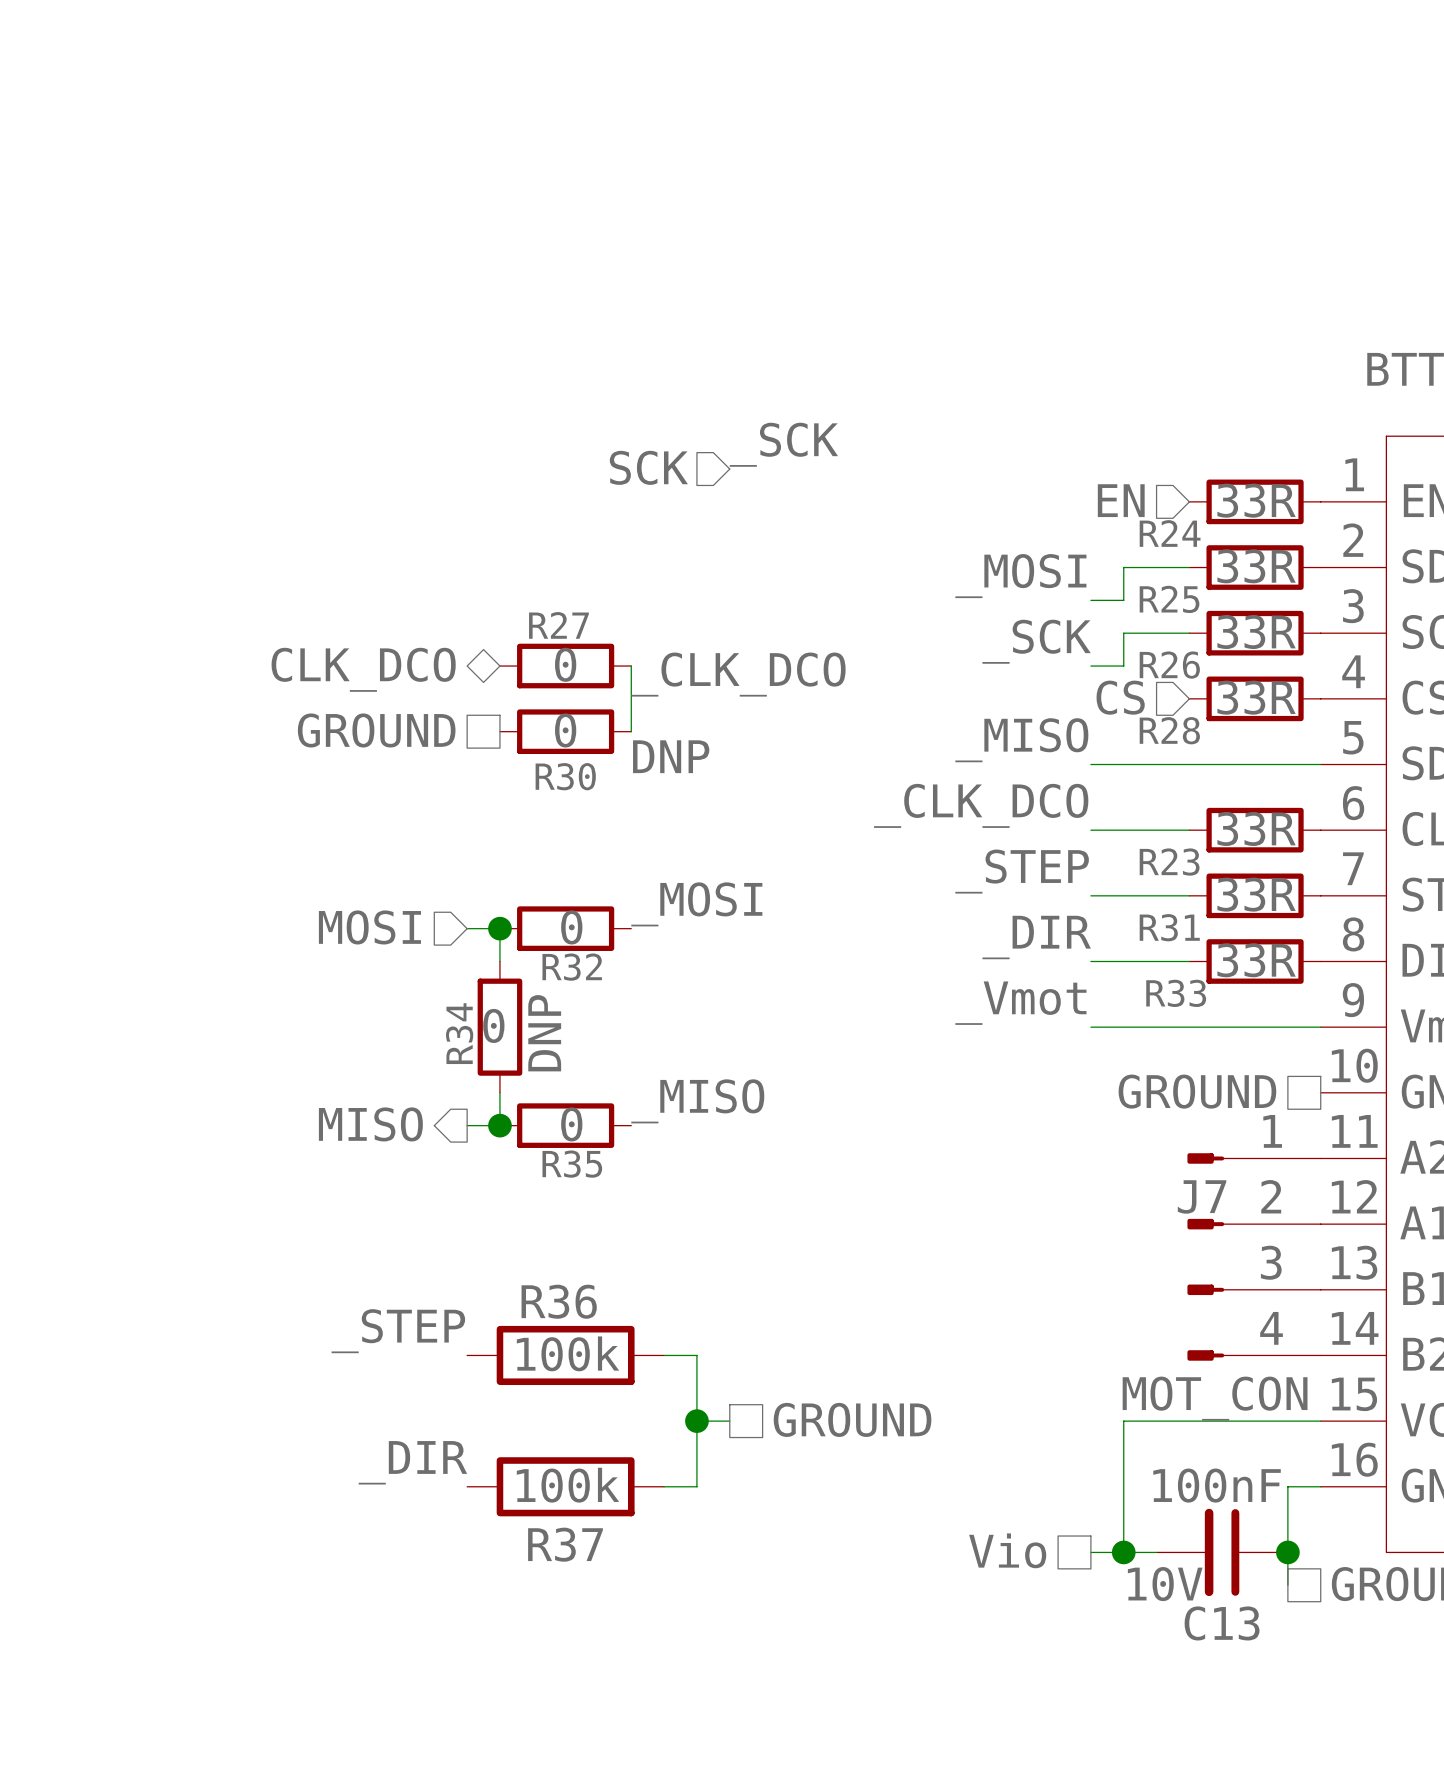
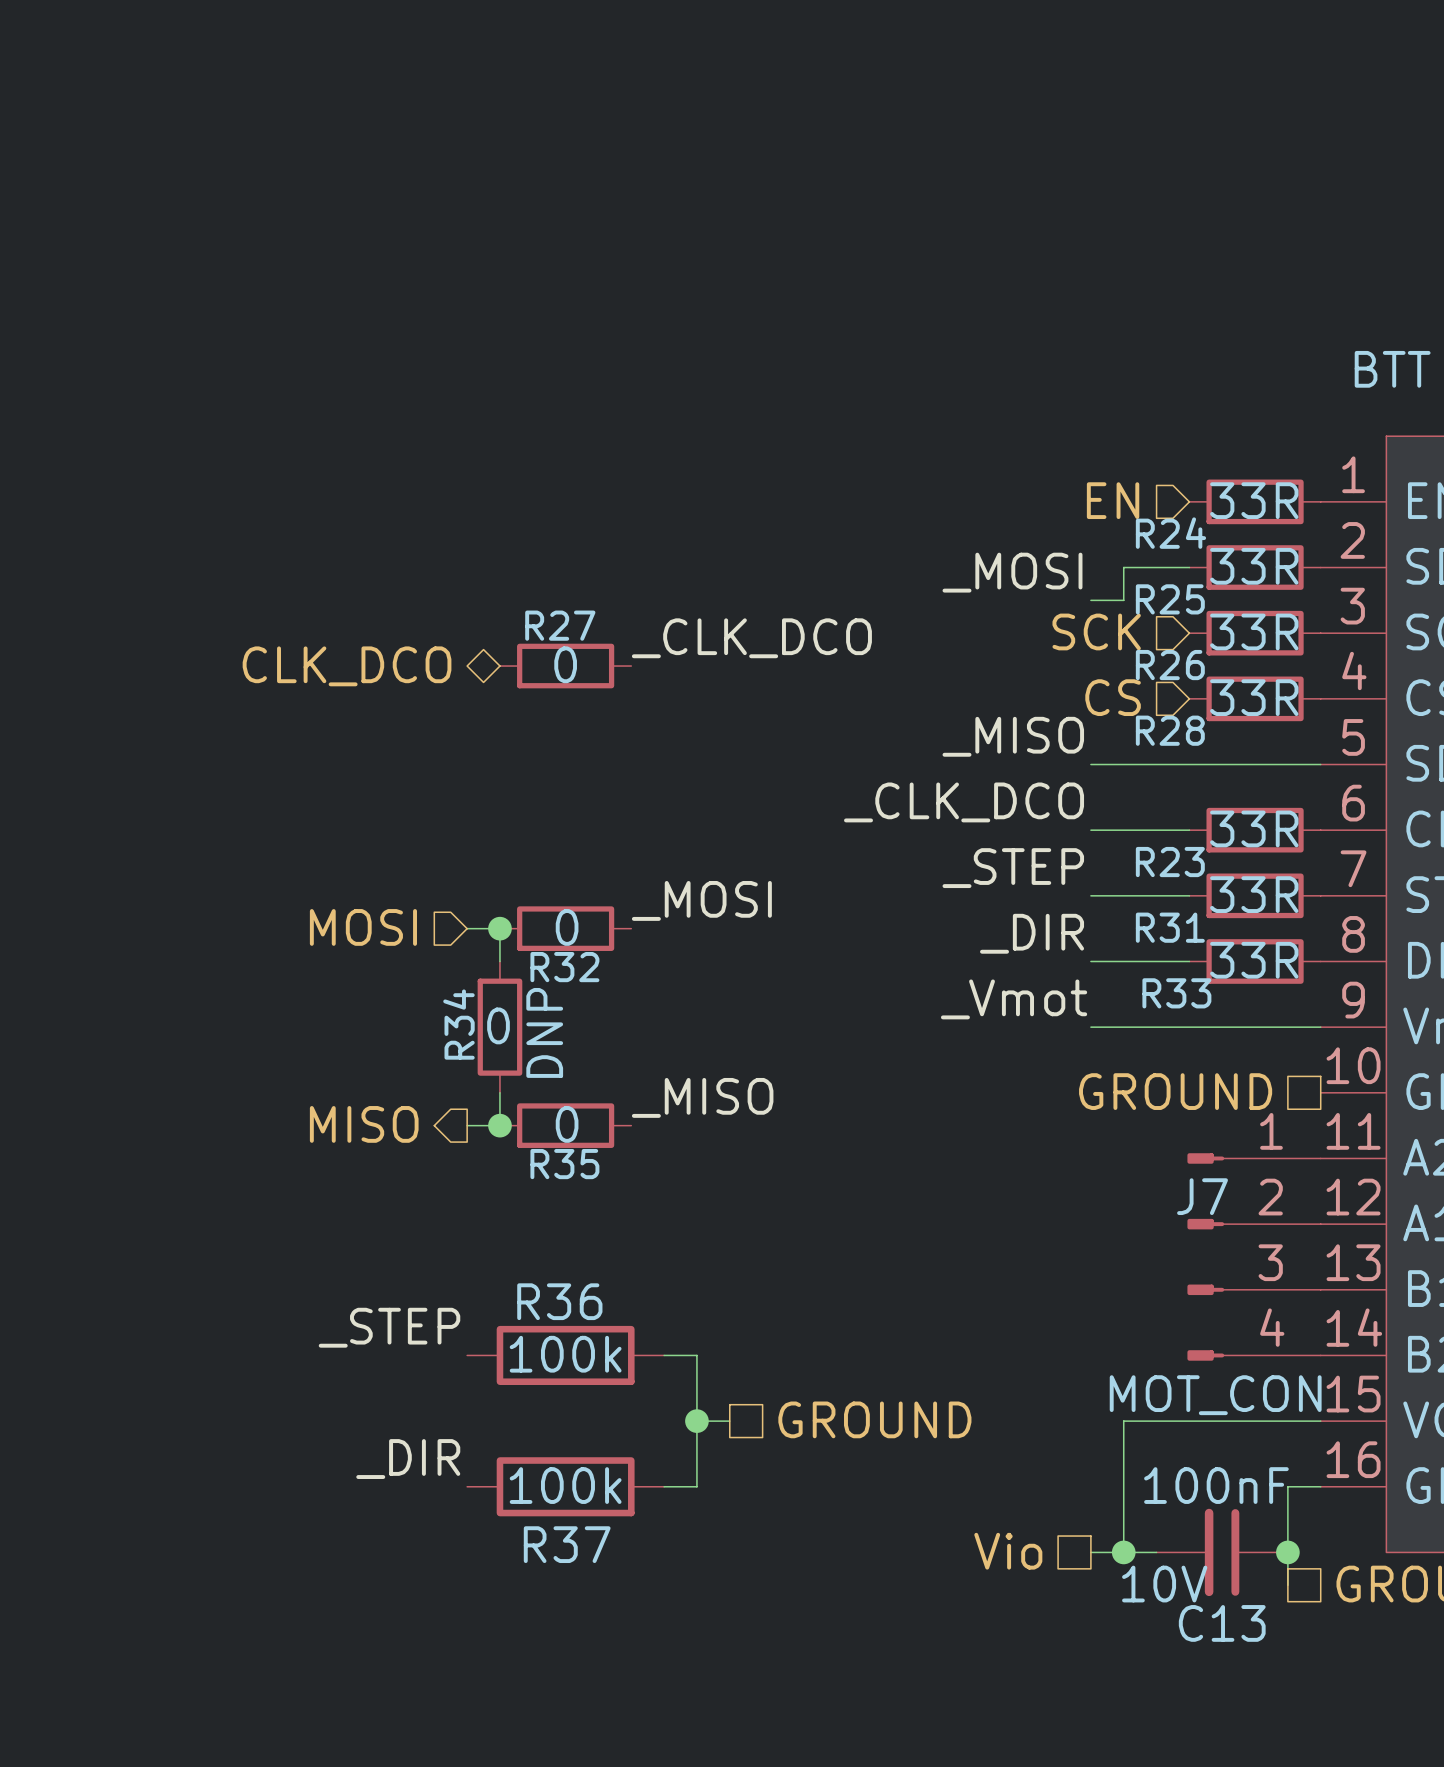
label: _SCK (783, 444) -> none
hierarchical label position: SCK (648, 467) -> SCK (1096, 631)
wire: (1189, 633) (1123, 633) (1123, 666) (1090, 666) -> none
label: _SCK (1036, 641) -> none
wire: (631, 666) (631, 731) -> none
label position: _CLK_DCO (738, 674) -> _CLK_DCO (751, 638)
hierarchical label: GROUND (376, 730) -> none
R30: 0 (565, 731) -> none

